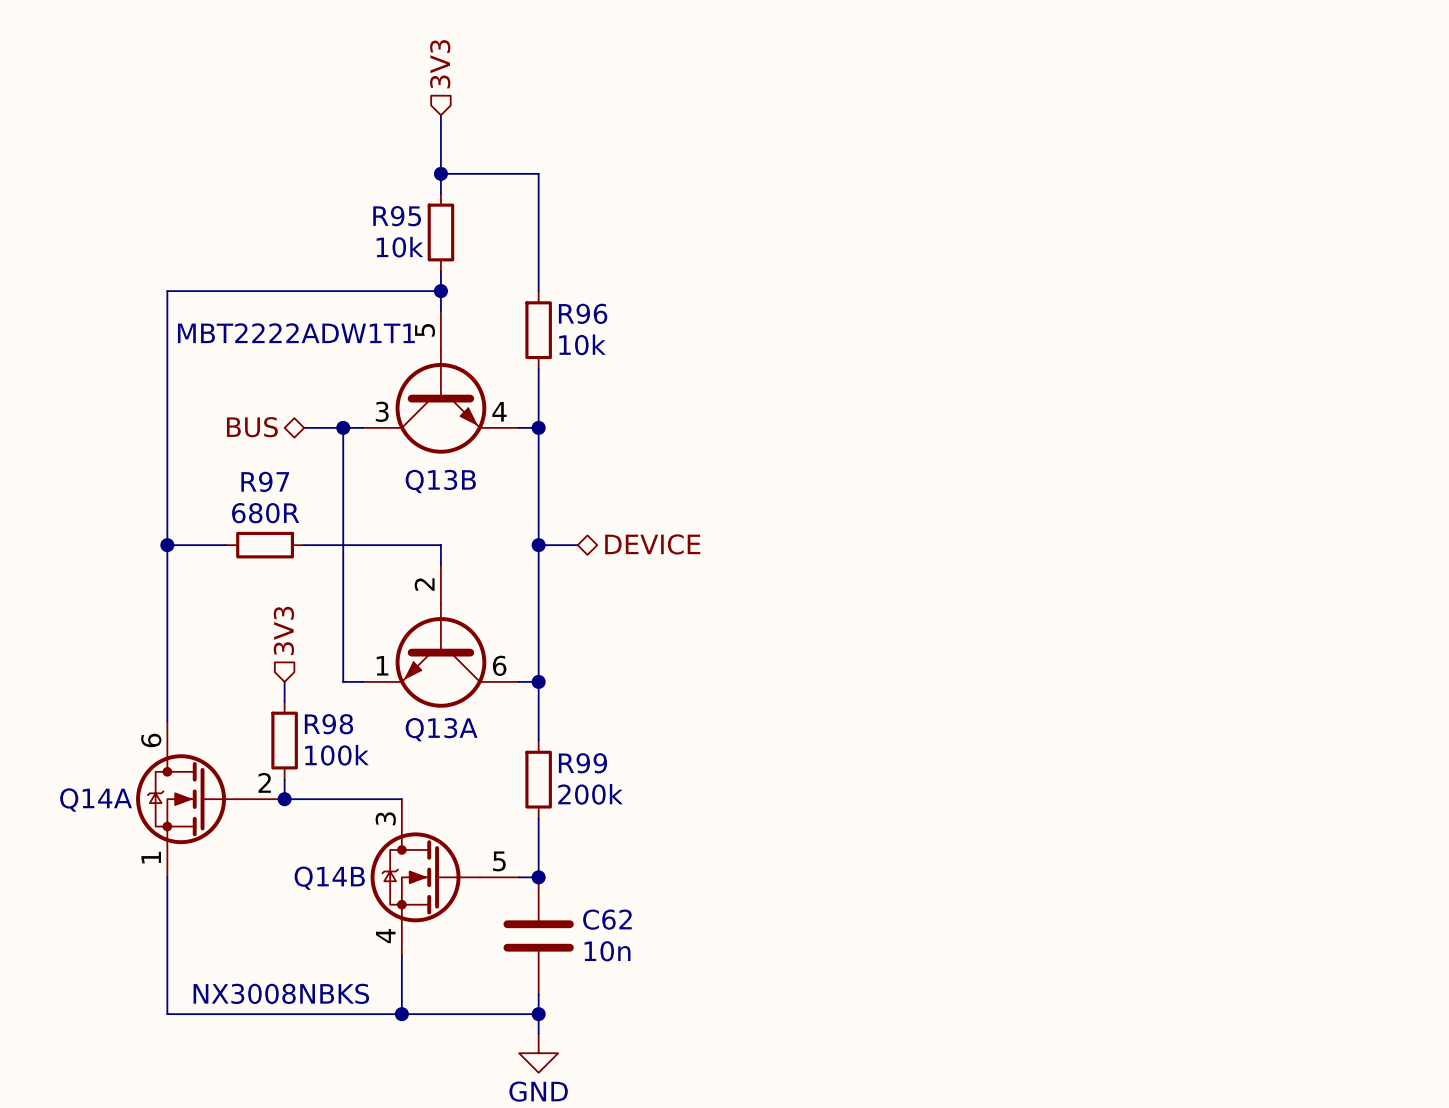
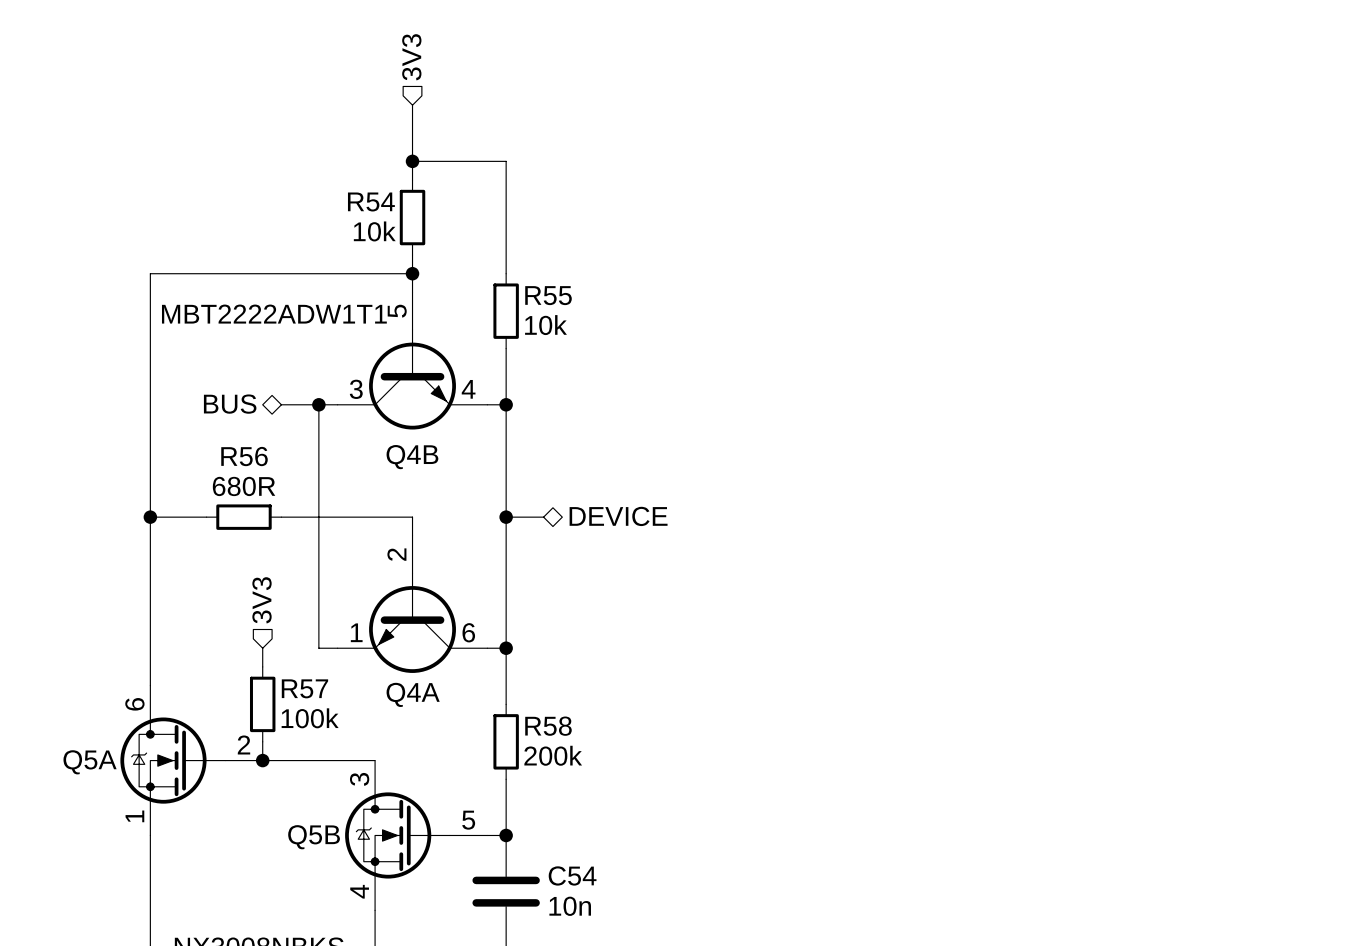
R95 name: R95 (397, 216) -> R54 (371, 201)
R96 name: R96 (583, 313) -> R55 (548, 295)
Q13B: MBT2222ADW1T1 (440, 382) -> none
Q4B: none -> MBT2222ADW1T1 (412, 360)
R97 name: R97 (265, 481) -> R56 (244, 456)
Q13A: (440, 636) -> none
Q4A: none -> (412, 604)
R98 name: R98 (328, 724) -> R57 (304, 688)
R99 name: R99 (582, 763) -> R58 (548, 726)
Q14A name: Q14A (96, 800) -> Q5A (90, 762)
Q14B name: Q14B (329, 878) -> Q5B (314, 837)
C62 name: C62 (607, 919) -> C54 (572, 875)

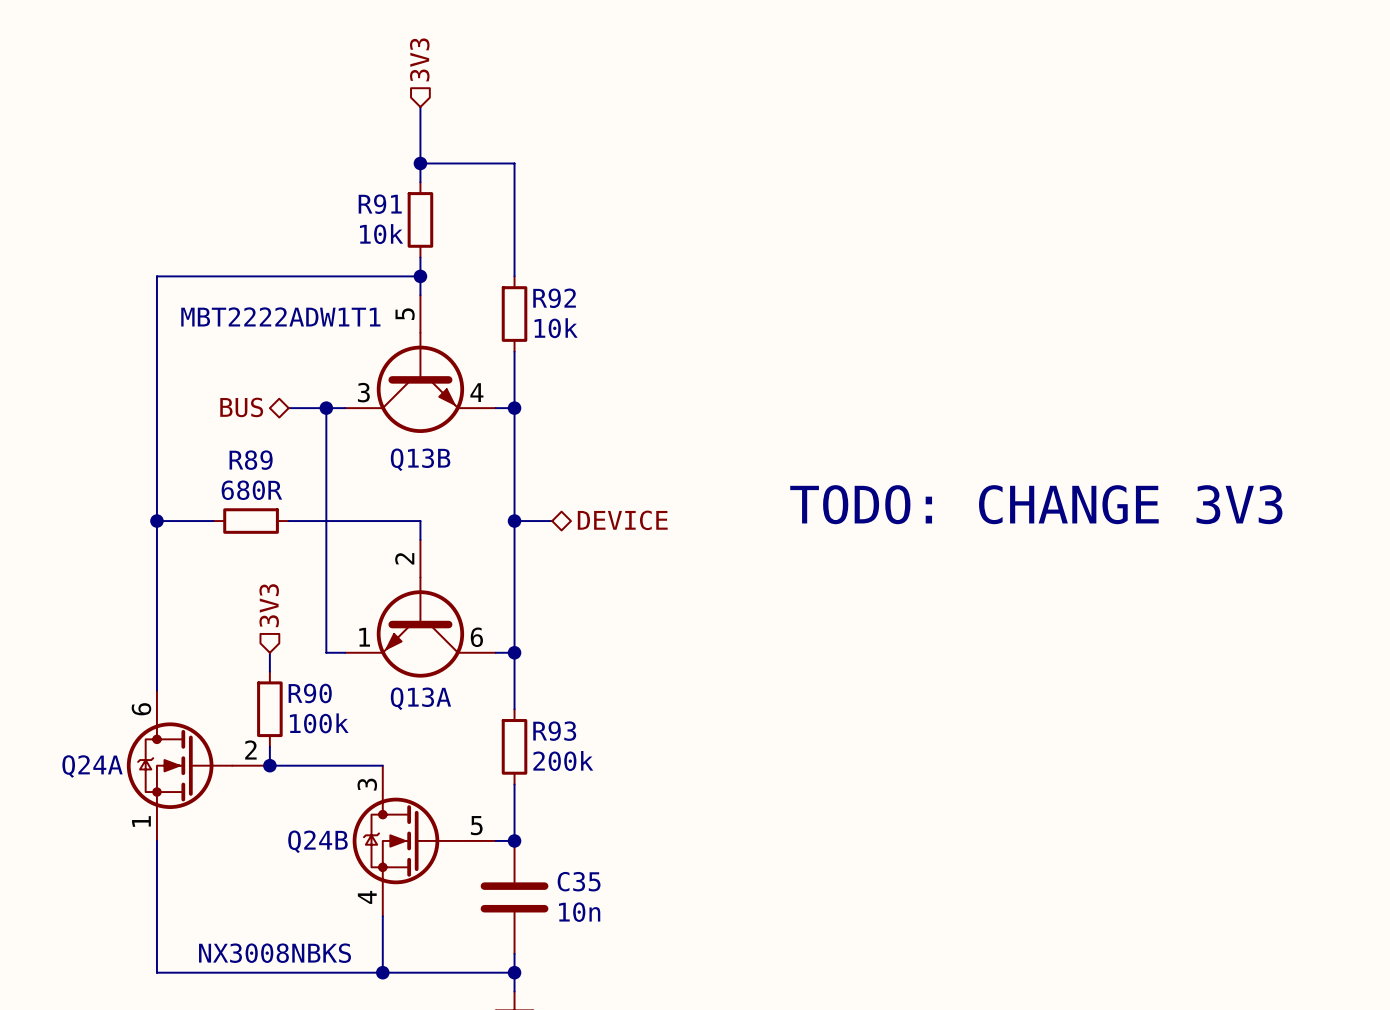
R54 name: R54 (371, 201) -> R91 (380, 204)
R55 name: R55 (548, 295) -> R92 (554, 298)
R56 name: R56 (244, 456) -> R89 (251, 460)
Q4B name: Q4B (412, 457) -> Q13B (420, 459)
text: none -> TODO: CHANGE 3V3 (1036, 504)
R57 name: R57 (304, 688) -> R90 (310, 693)
Q4A name: Q4A (413, 694) -> Q13A (420, 698)
R58 name: R58 (548, 726) -> R93 (554, 731)
Q5A name: Q5A (90, 762) -> Q24A (92, 766)
Q5B name: Q5B (314, 837) -> Q24B (317, 841)
C54 name: C54 (572, 875) -> C35 (579, 881)

